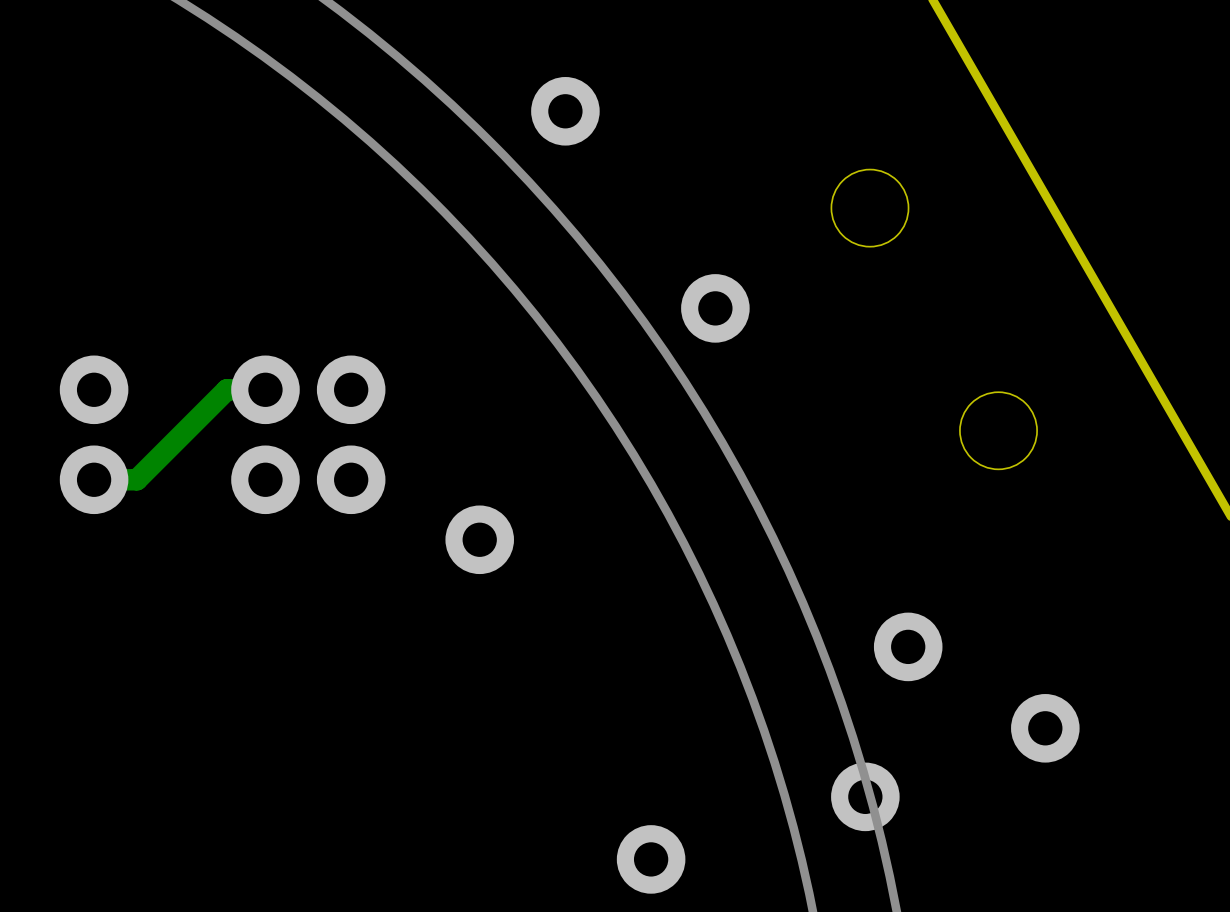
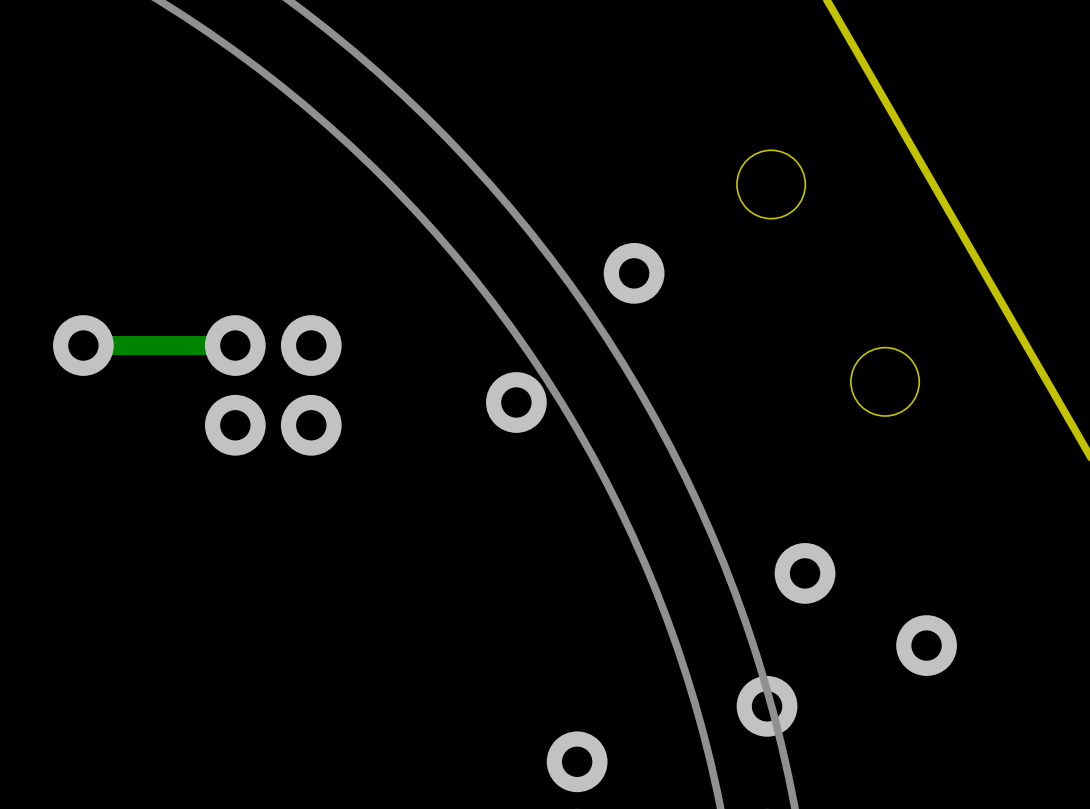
via: (565, 111) -> none
track: (226, 389) (136, 479) (94, 479) -> (201, 345) (83, 345)
via: (94, 479) -> none
via position: (479, 539) -> (516, 402)

